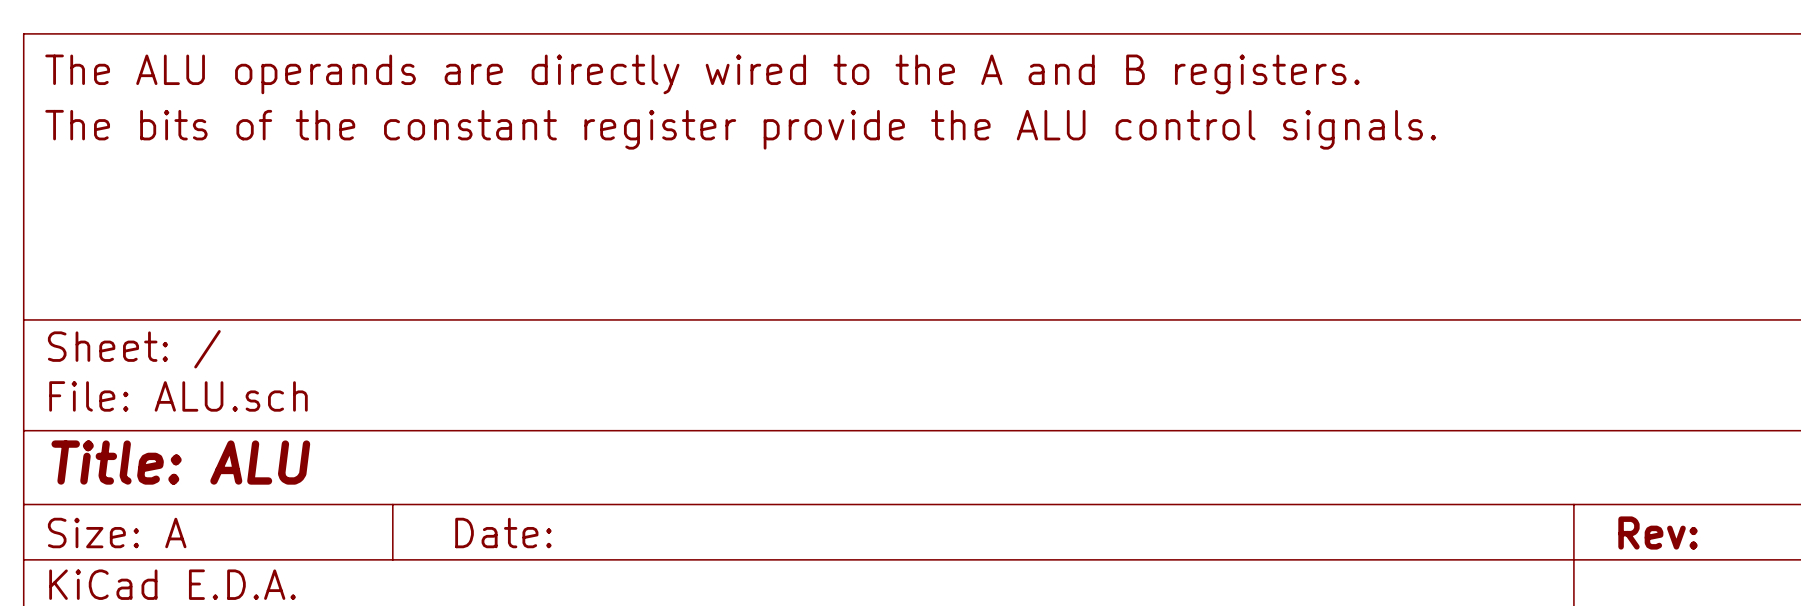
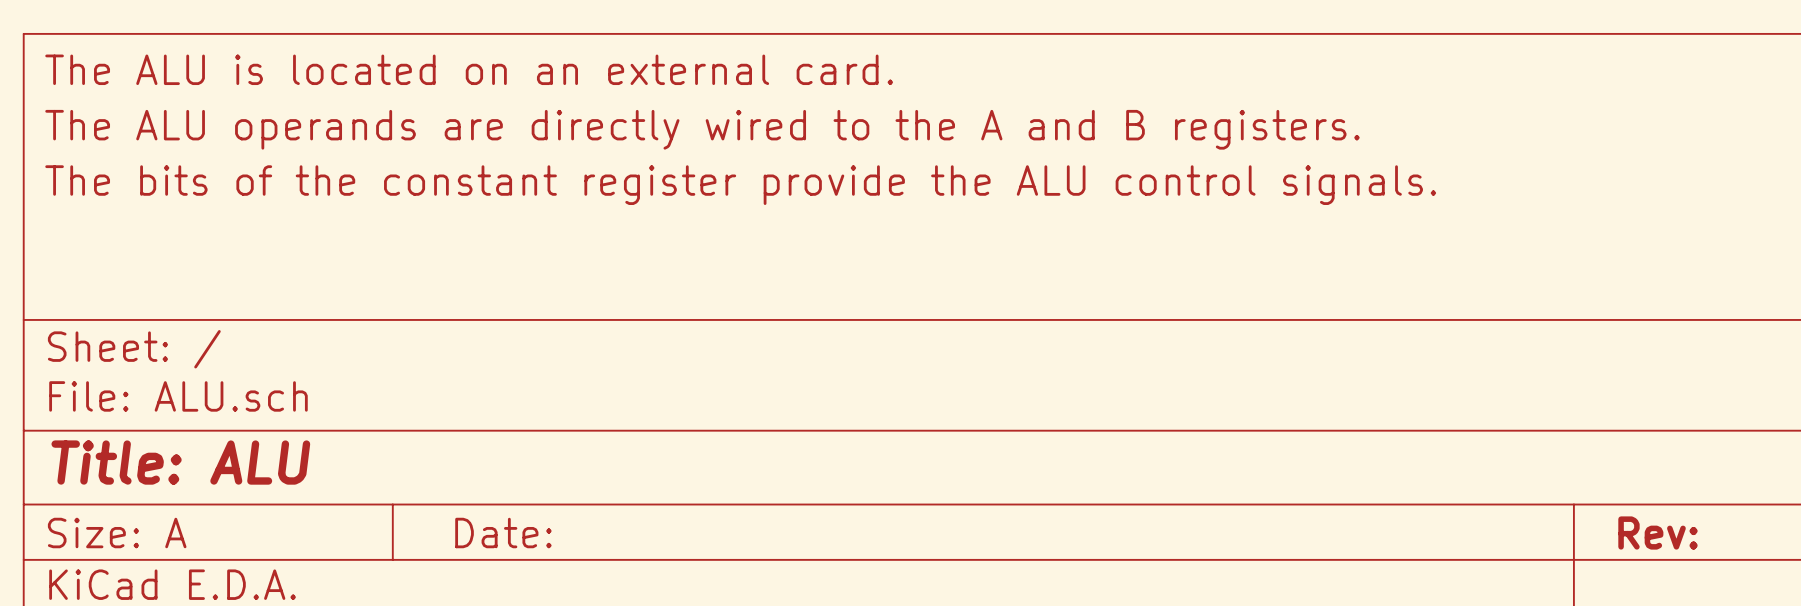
title block: The ALU operands are directly wired to the A and B registers. (702, 74) -> The ALU is located on an external card. (469, 69)
title block: The bits of the constant register provide the ALU control signals. (740, 129) -> The ALU operands are directly wired to the A and B registers. (702, 129)
title block: none -> The bits of the constant register provide the ALU control signals. (740, 185)

